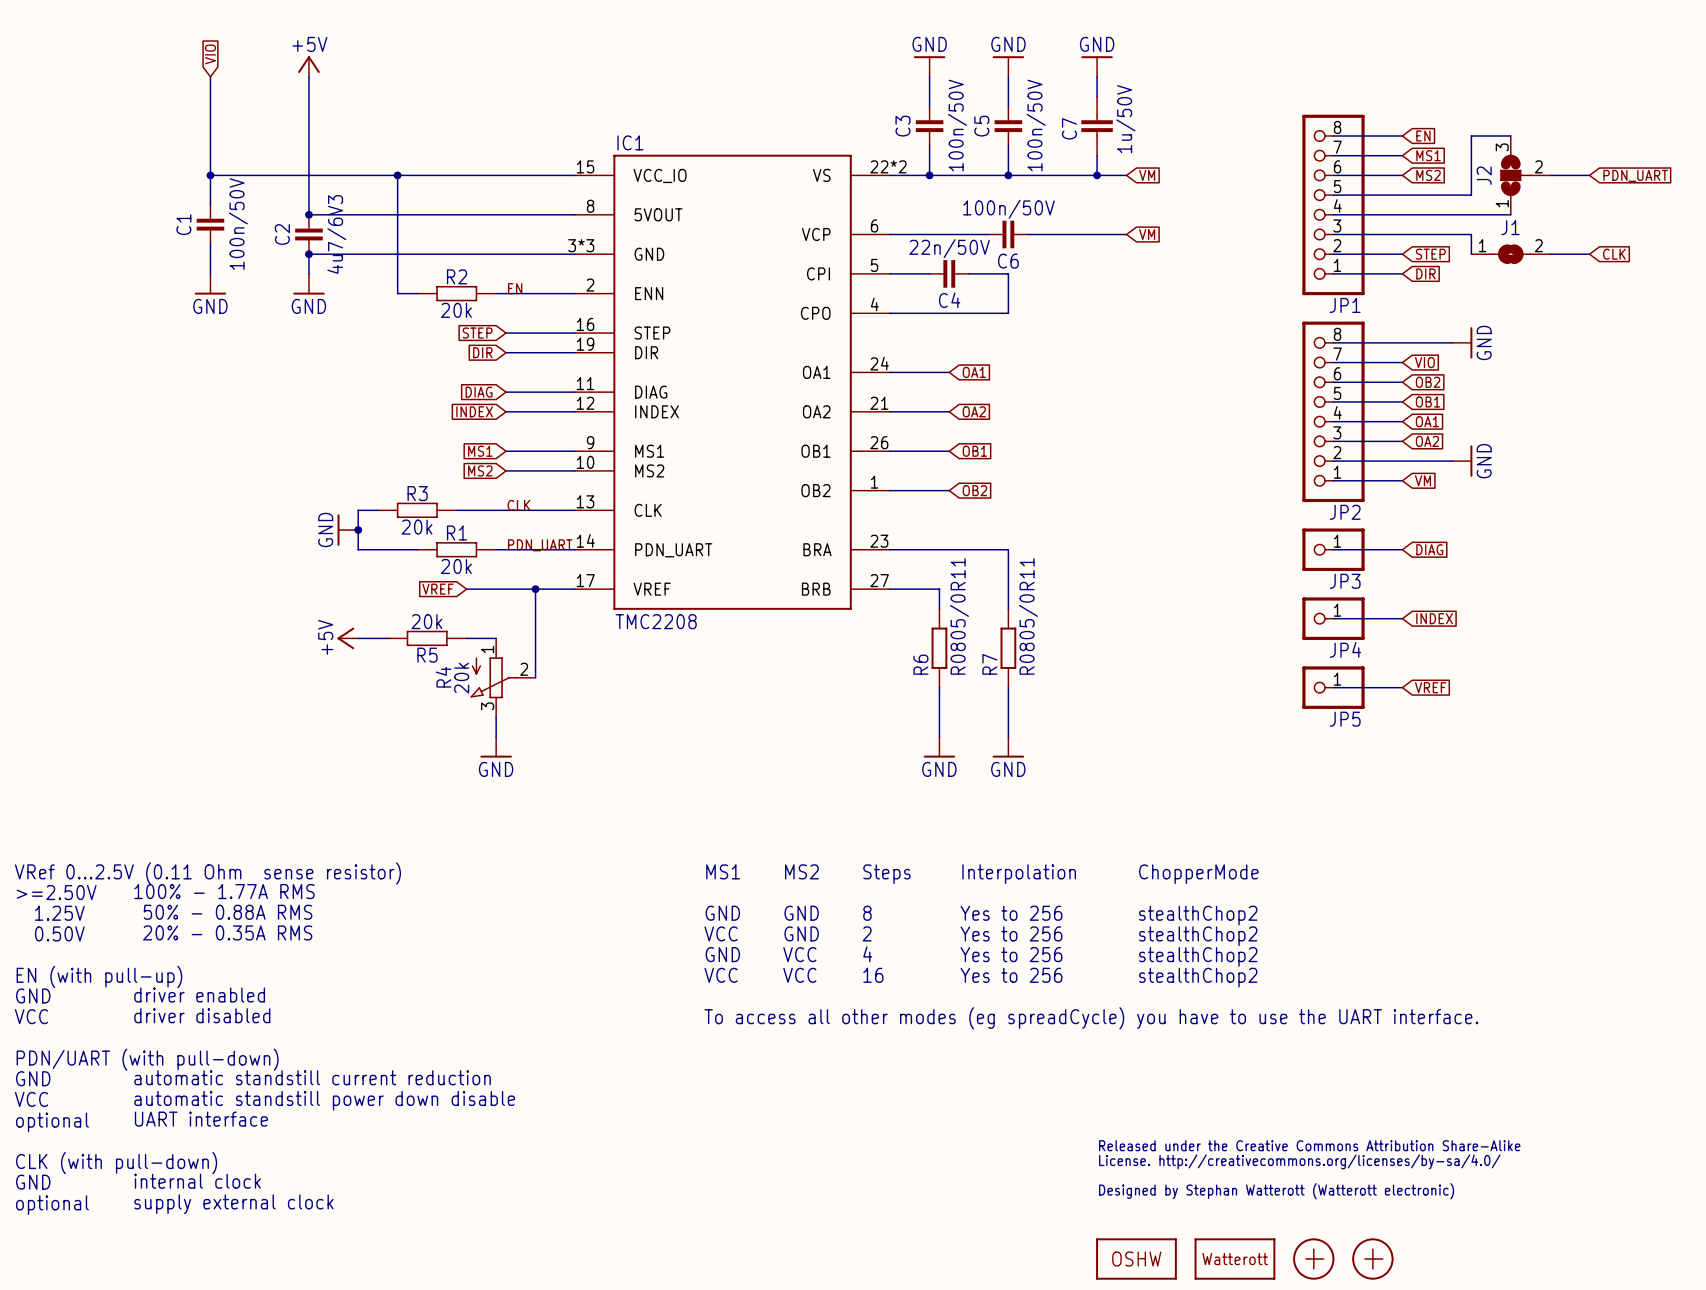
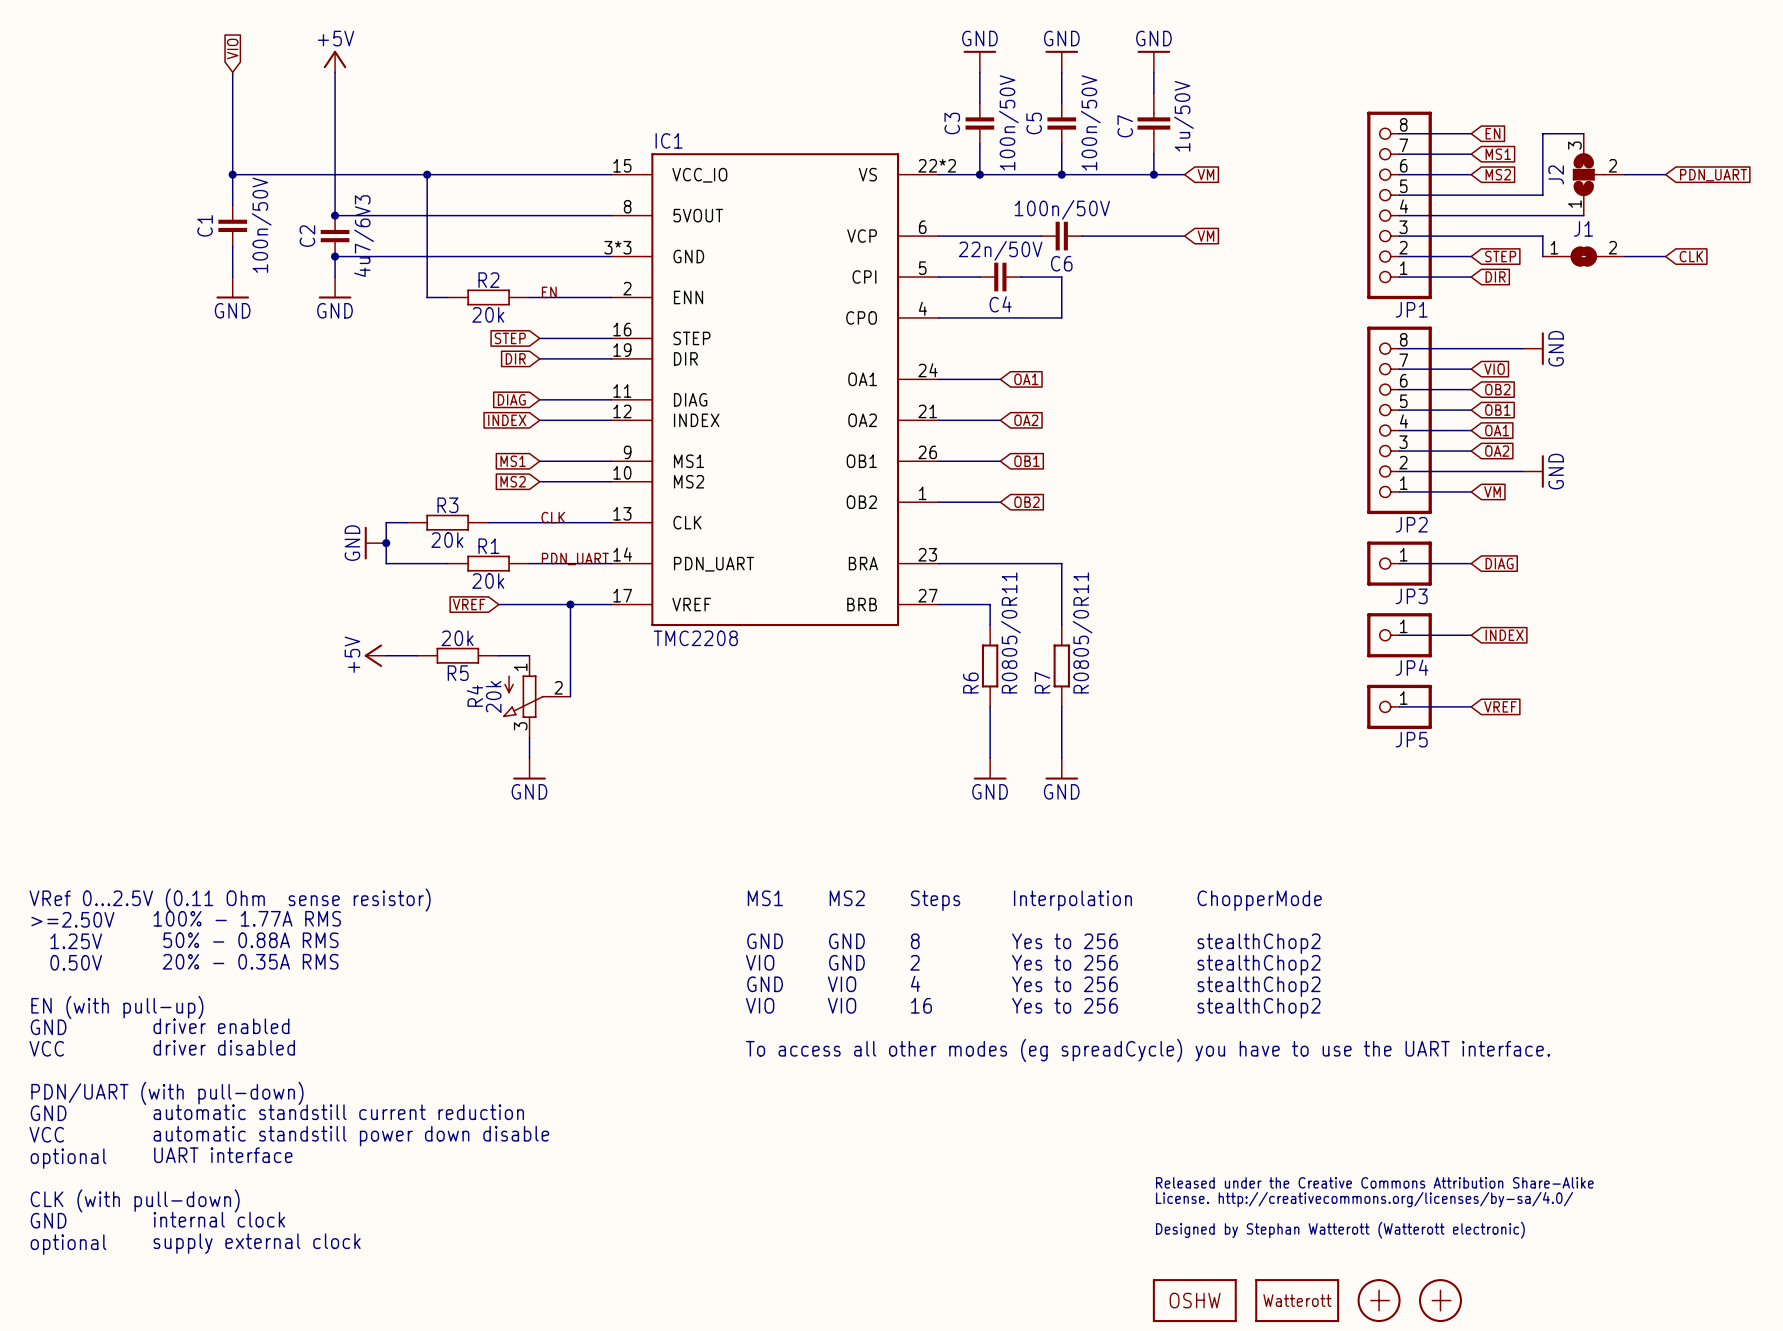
text: VCC (721, 933) -> VIO (760, 962)
text: VCC (799, 954) -> VIO (842, 984)
text: VCC (721, 975) -> VIO (760, 1005)
text: VCC (799, 975) -> VIO (842, 1005)

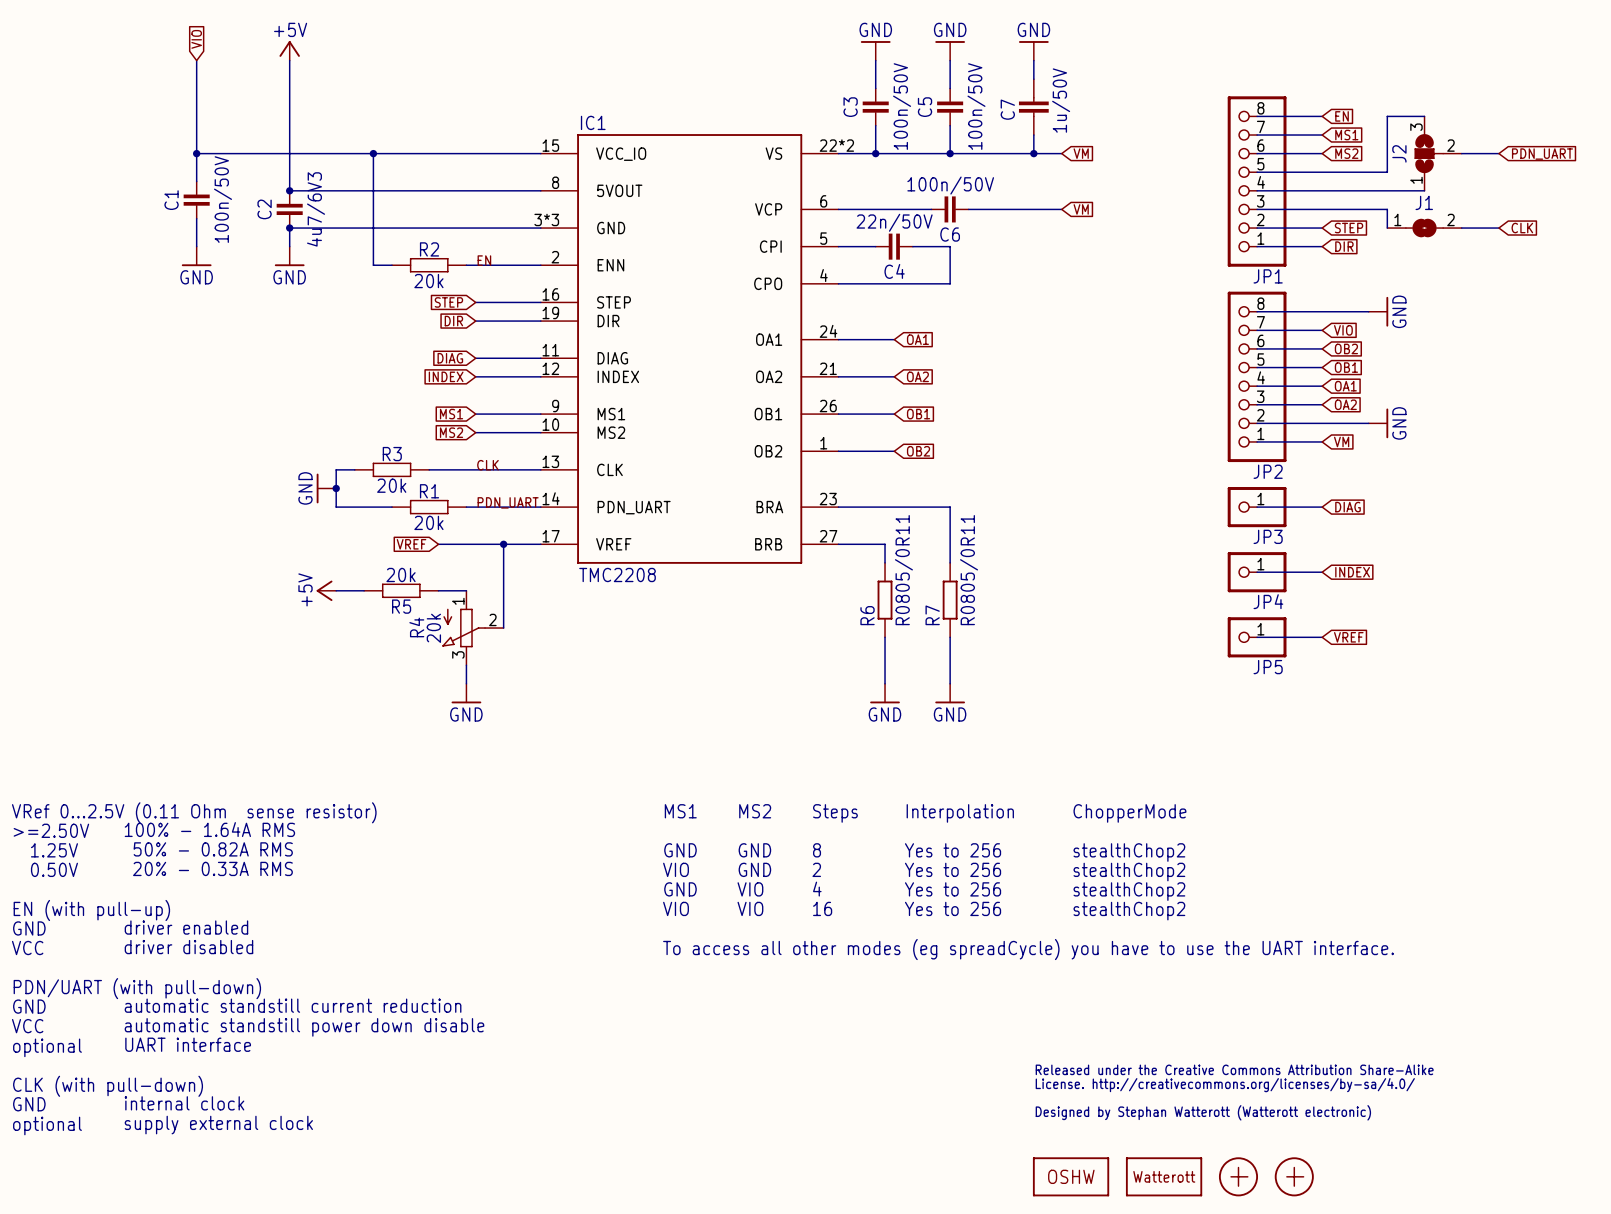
text: 100% - 1.77A RMS (247, 918) -> 100% - 1.64A RMS (209, 829)
text: 50% - 0.88A RMS (250, 940) -> 50% - 0.82A RMS (213, 849)
text: 20% - 0.35A RMS (250, 961) -> 20% - 0.33A RMS (212, 868)

